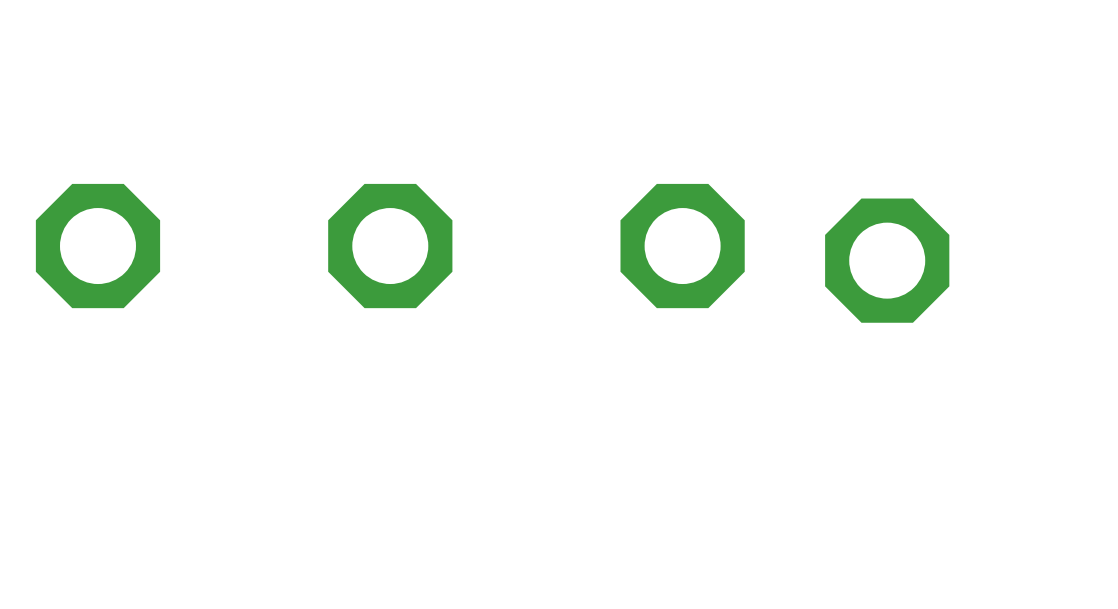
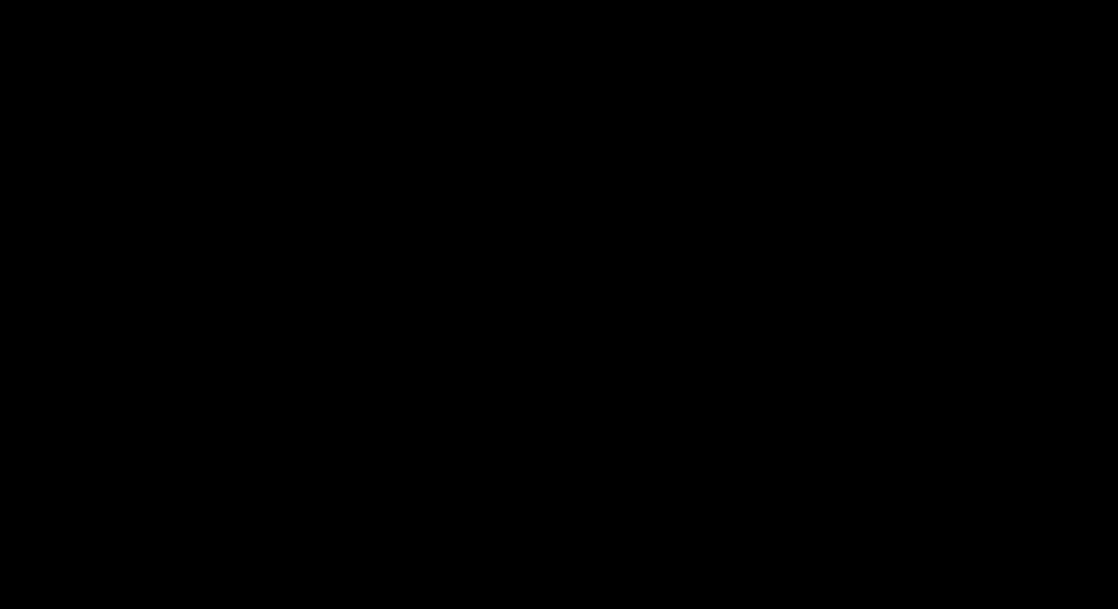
part: (97, 246) -> none
part: (390, 246) -> none
part: (682, 246) -> none
part: (887, 260) -> none

